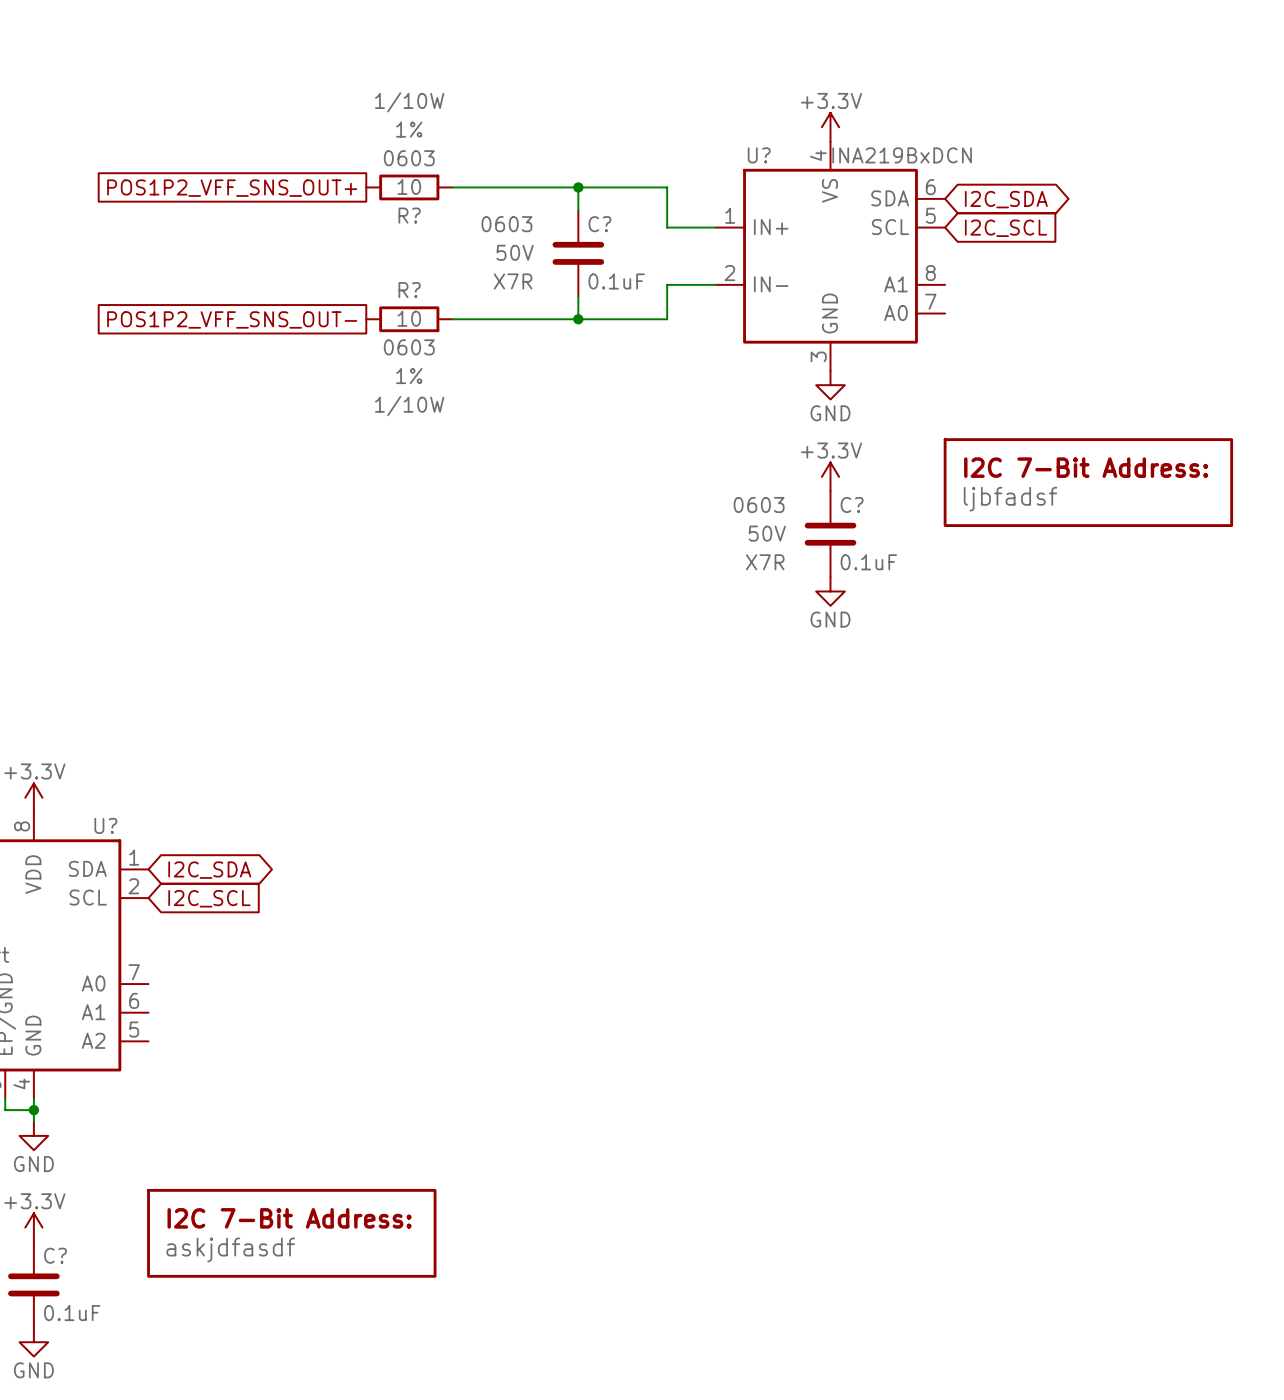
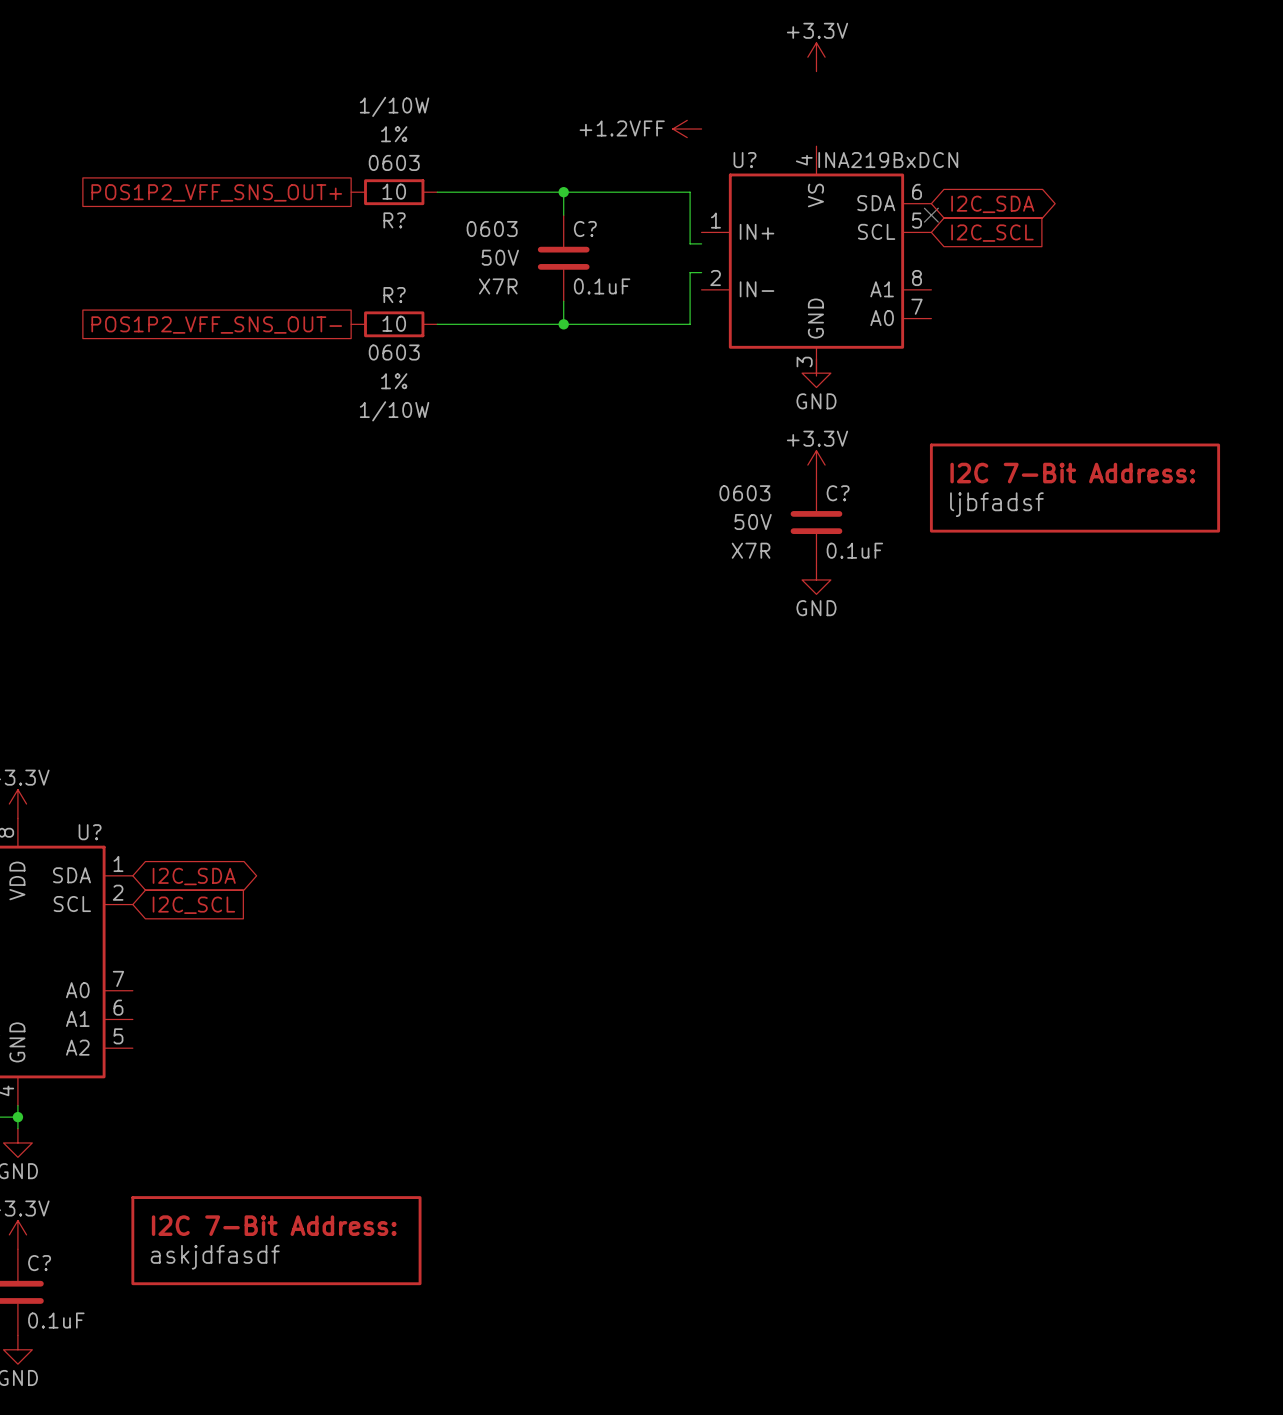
power symbol: none -> +1.2VFF (687, 129)
power symbol position: +3.3V (830, 127) -> +3.3V (816, 57)
wire: (667, 187) (667, 227) (715, 227) -> (652, 192) (690, 192) (690, 243) (701, 243)
no-connect mark: none -> (931, 215)
wire: (715, 284) (667, 284) (667, 319) -> (701, 272) (690, 272) (690, 324) (652, 324)
power symbol position: GND (830, 385) -> GND (816, 373)
power symbol position: +3.3V (830, 476) -> +3.3V (816, 465)
C? position: (830, 534) -> (816, 522)
power symbol position: GND (830, 591) -> GND (816, 579)

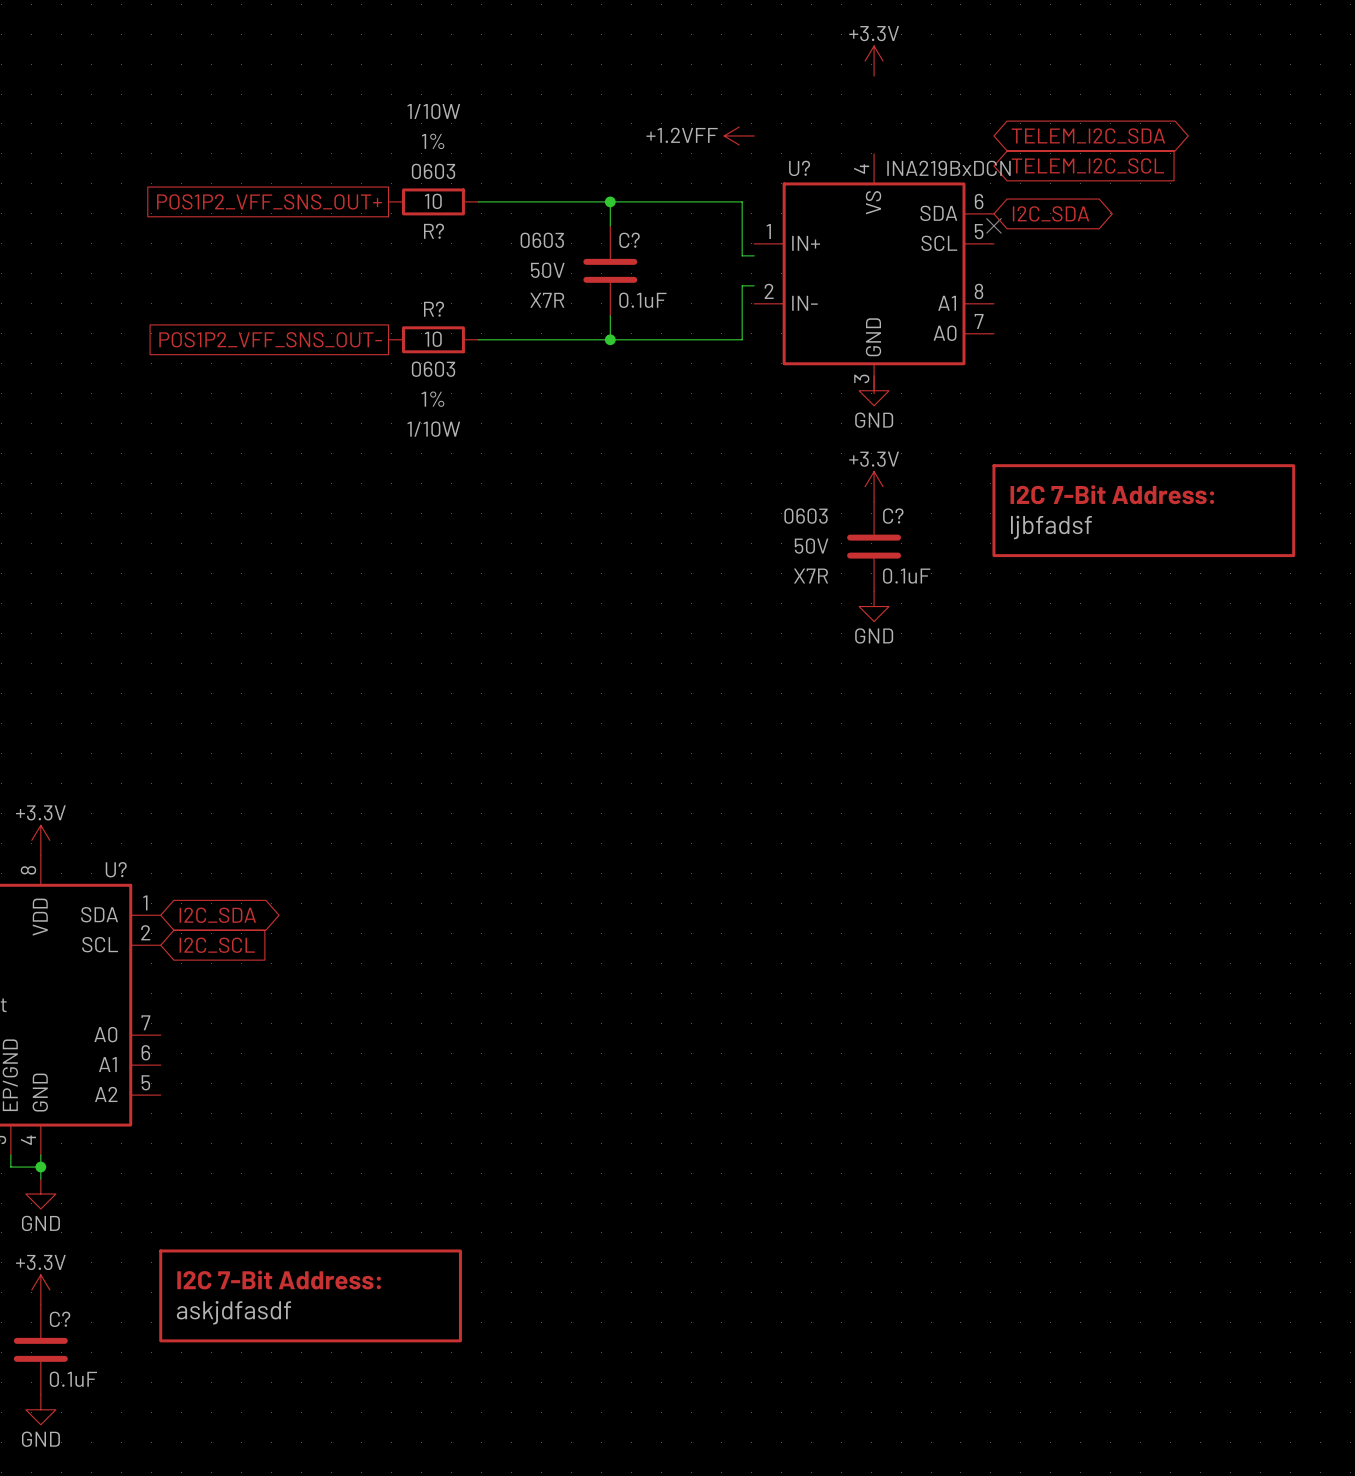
global label: none -> TELEM_I2C_SDA (1088, 135)
global label: none -> TELEM_I2C_SCL (1087, 165)
global label: I2C_SCL (992, 233) -> none

